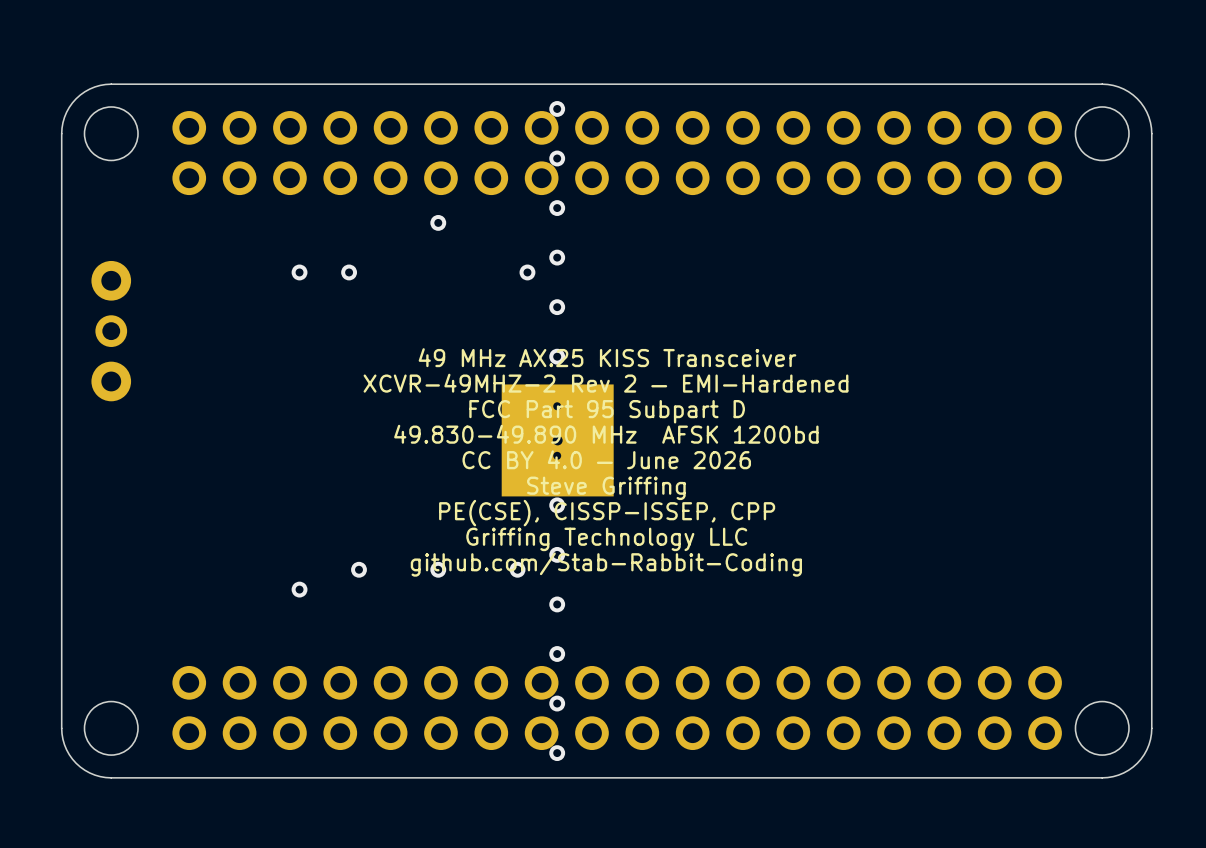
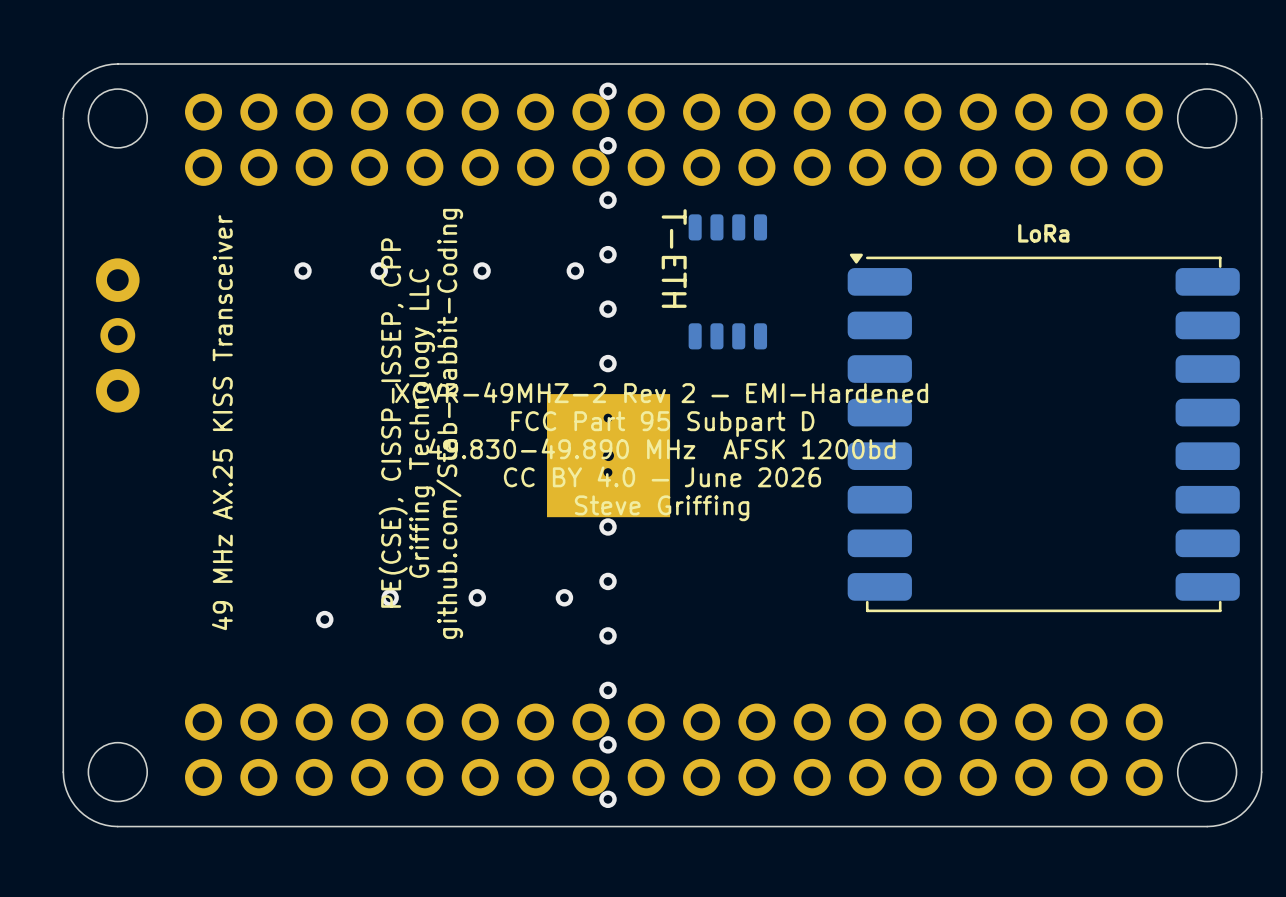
via position: (438, 222) -> (482, 270)
via position: (299, 272) -> (302, 270)
T-ETH: none -> (727, 281)
text rotation: 0° (607, 357) -> 90° counterclockwise (222, 422)
LoRa: none -> (1043, 432)
text rotation: 0° (607, 513) -> 90° counterclockwise (393, 423)
text rotation: 0° (606, 539) -> 90° counterclockwise (422, 423)
text rotation: 0° (606, 564) -> 90° counterclockwise (449, 423)

